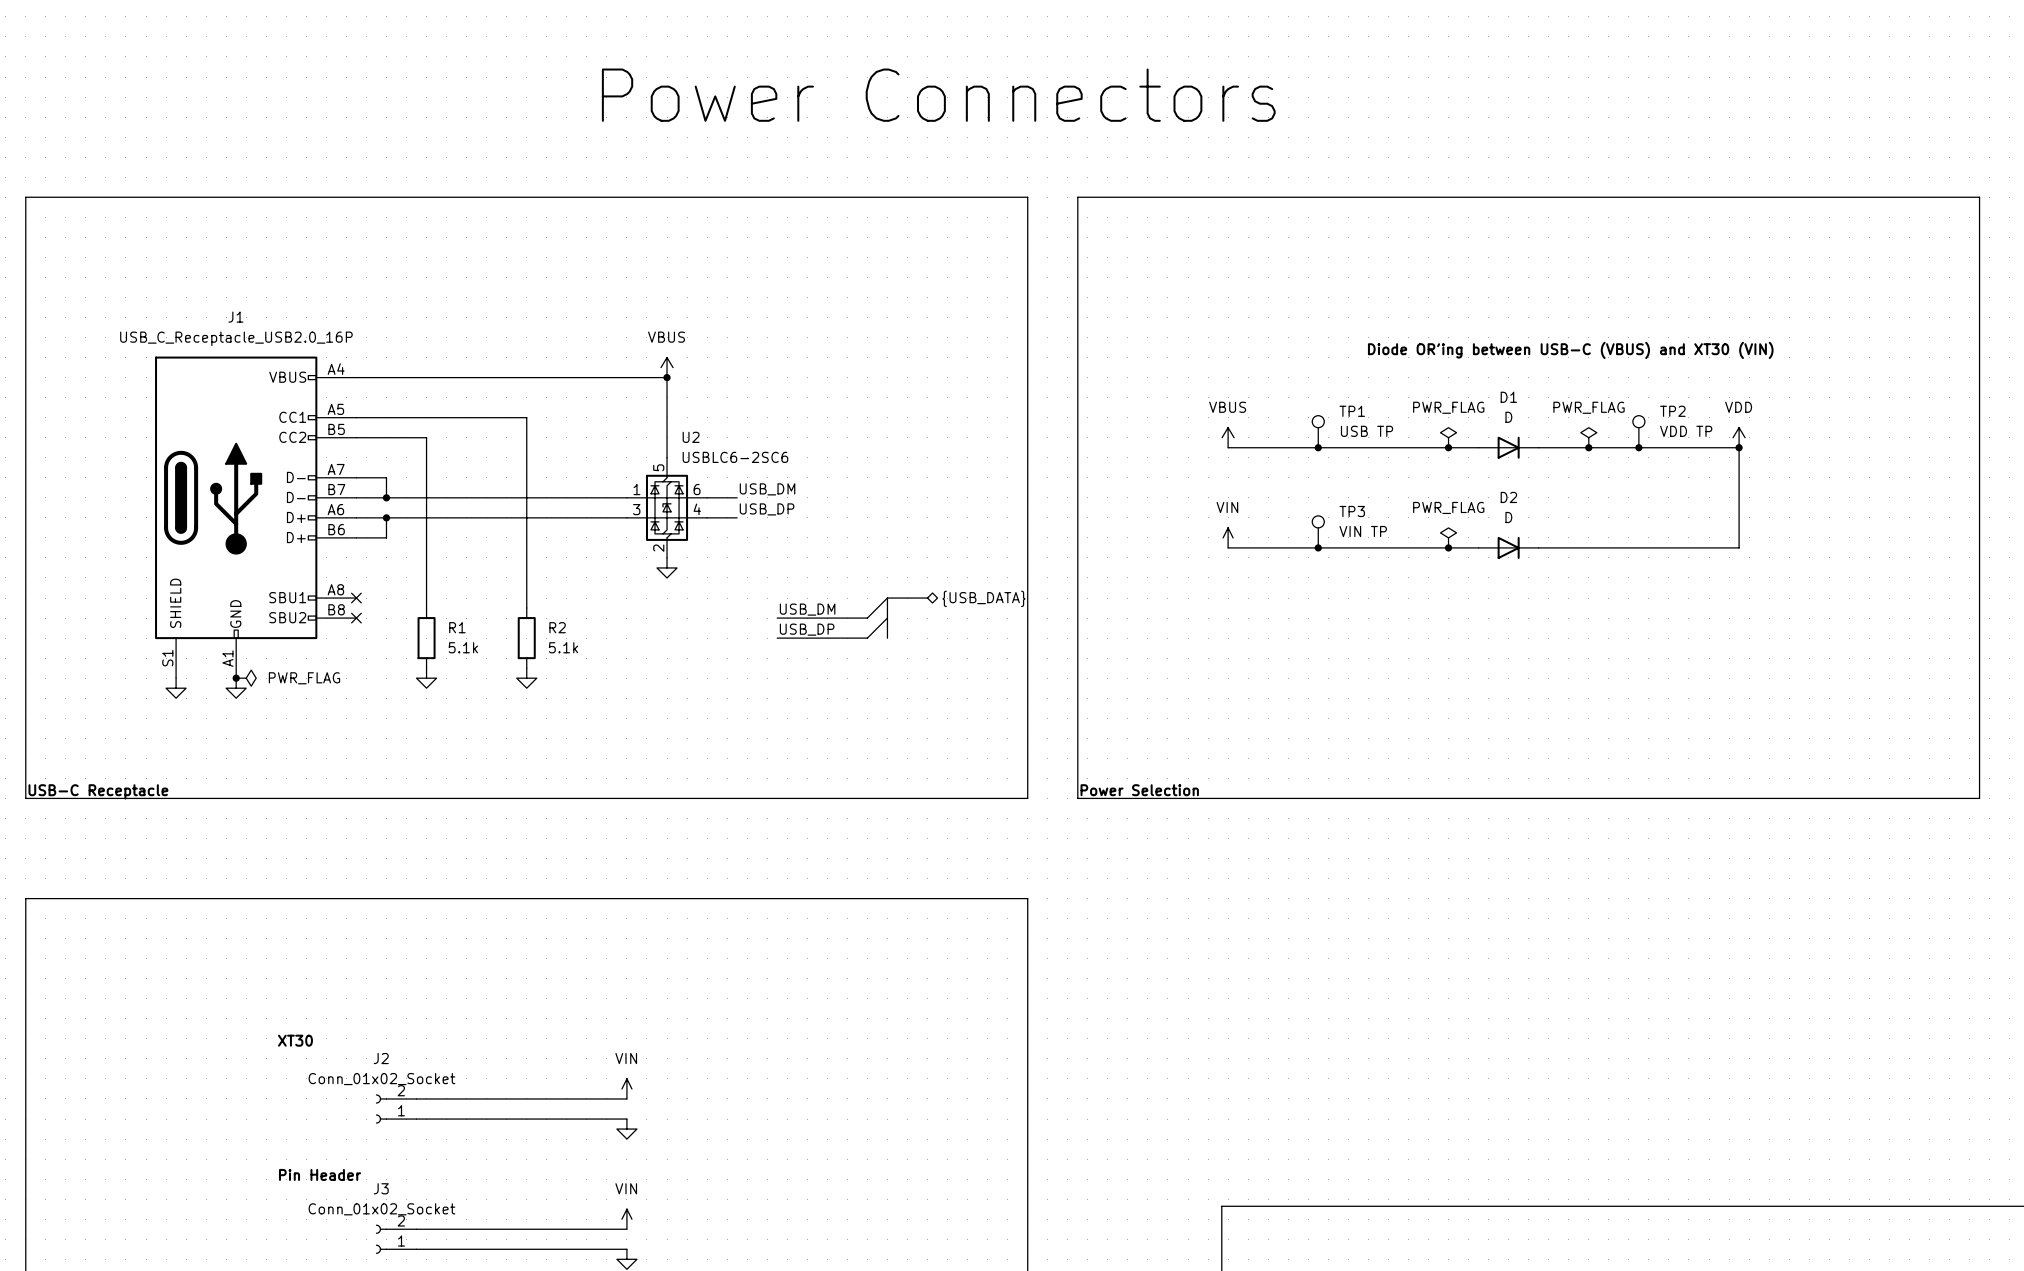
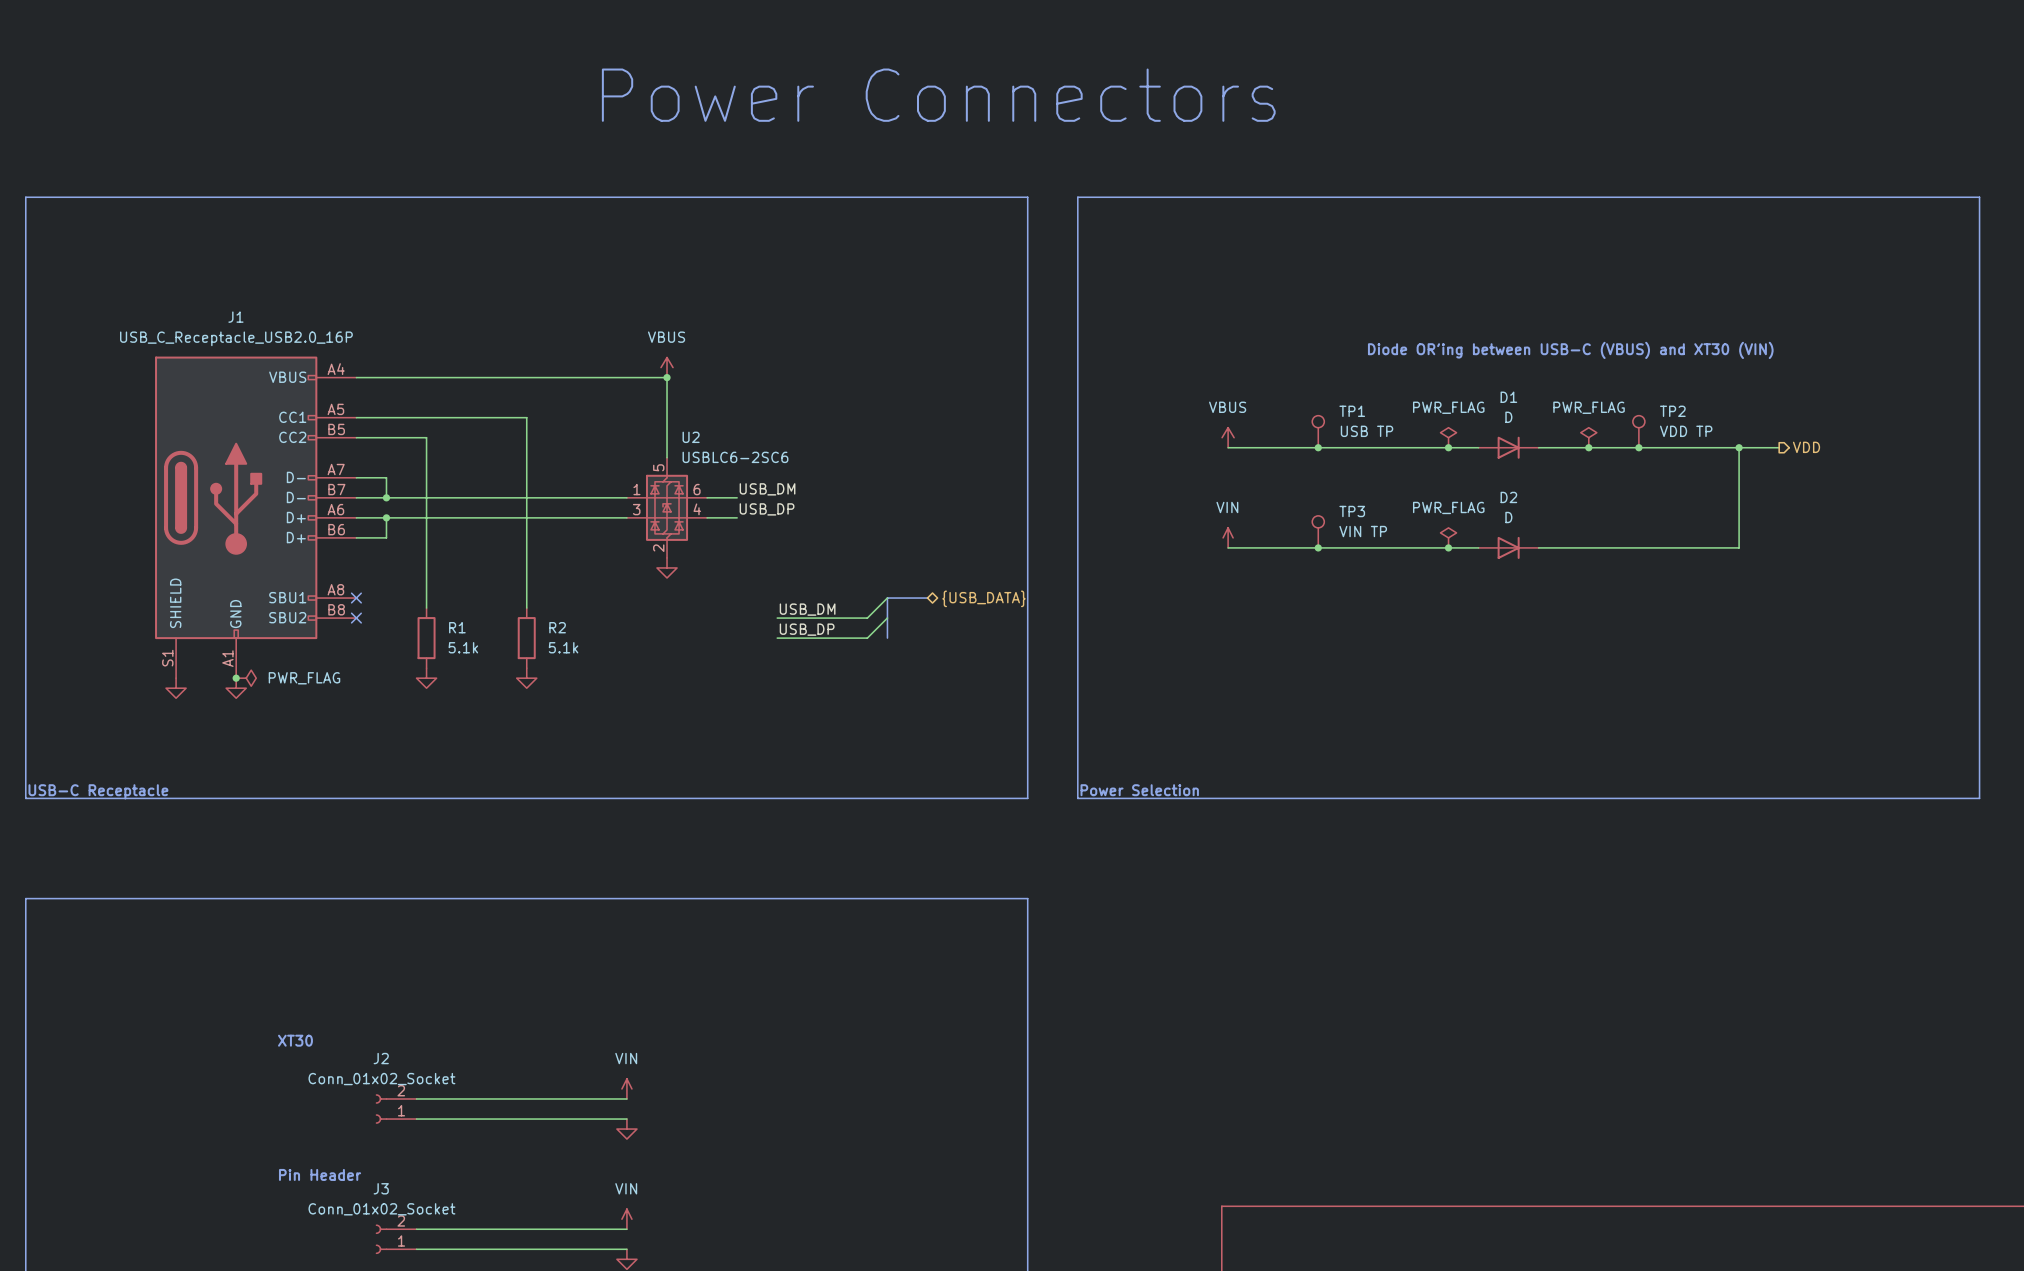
power symbol: VDD (1739, 437) -> none
wire: none -> (1739, 447) (1779, 447)
hierarchical label: none -> VDD (1806, 447)

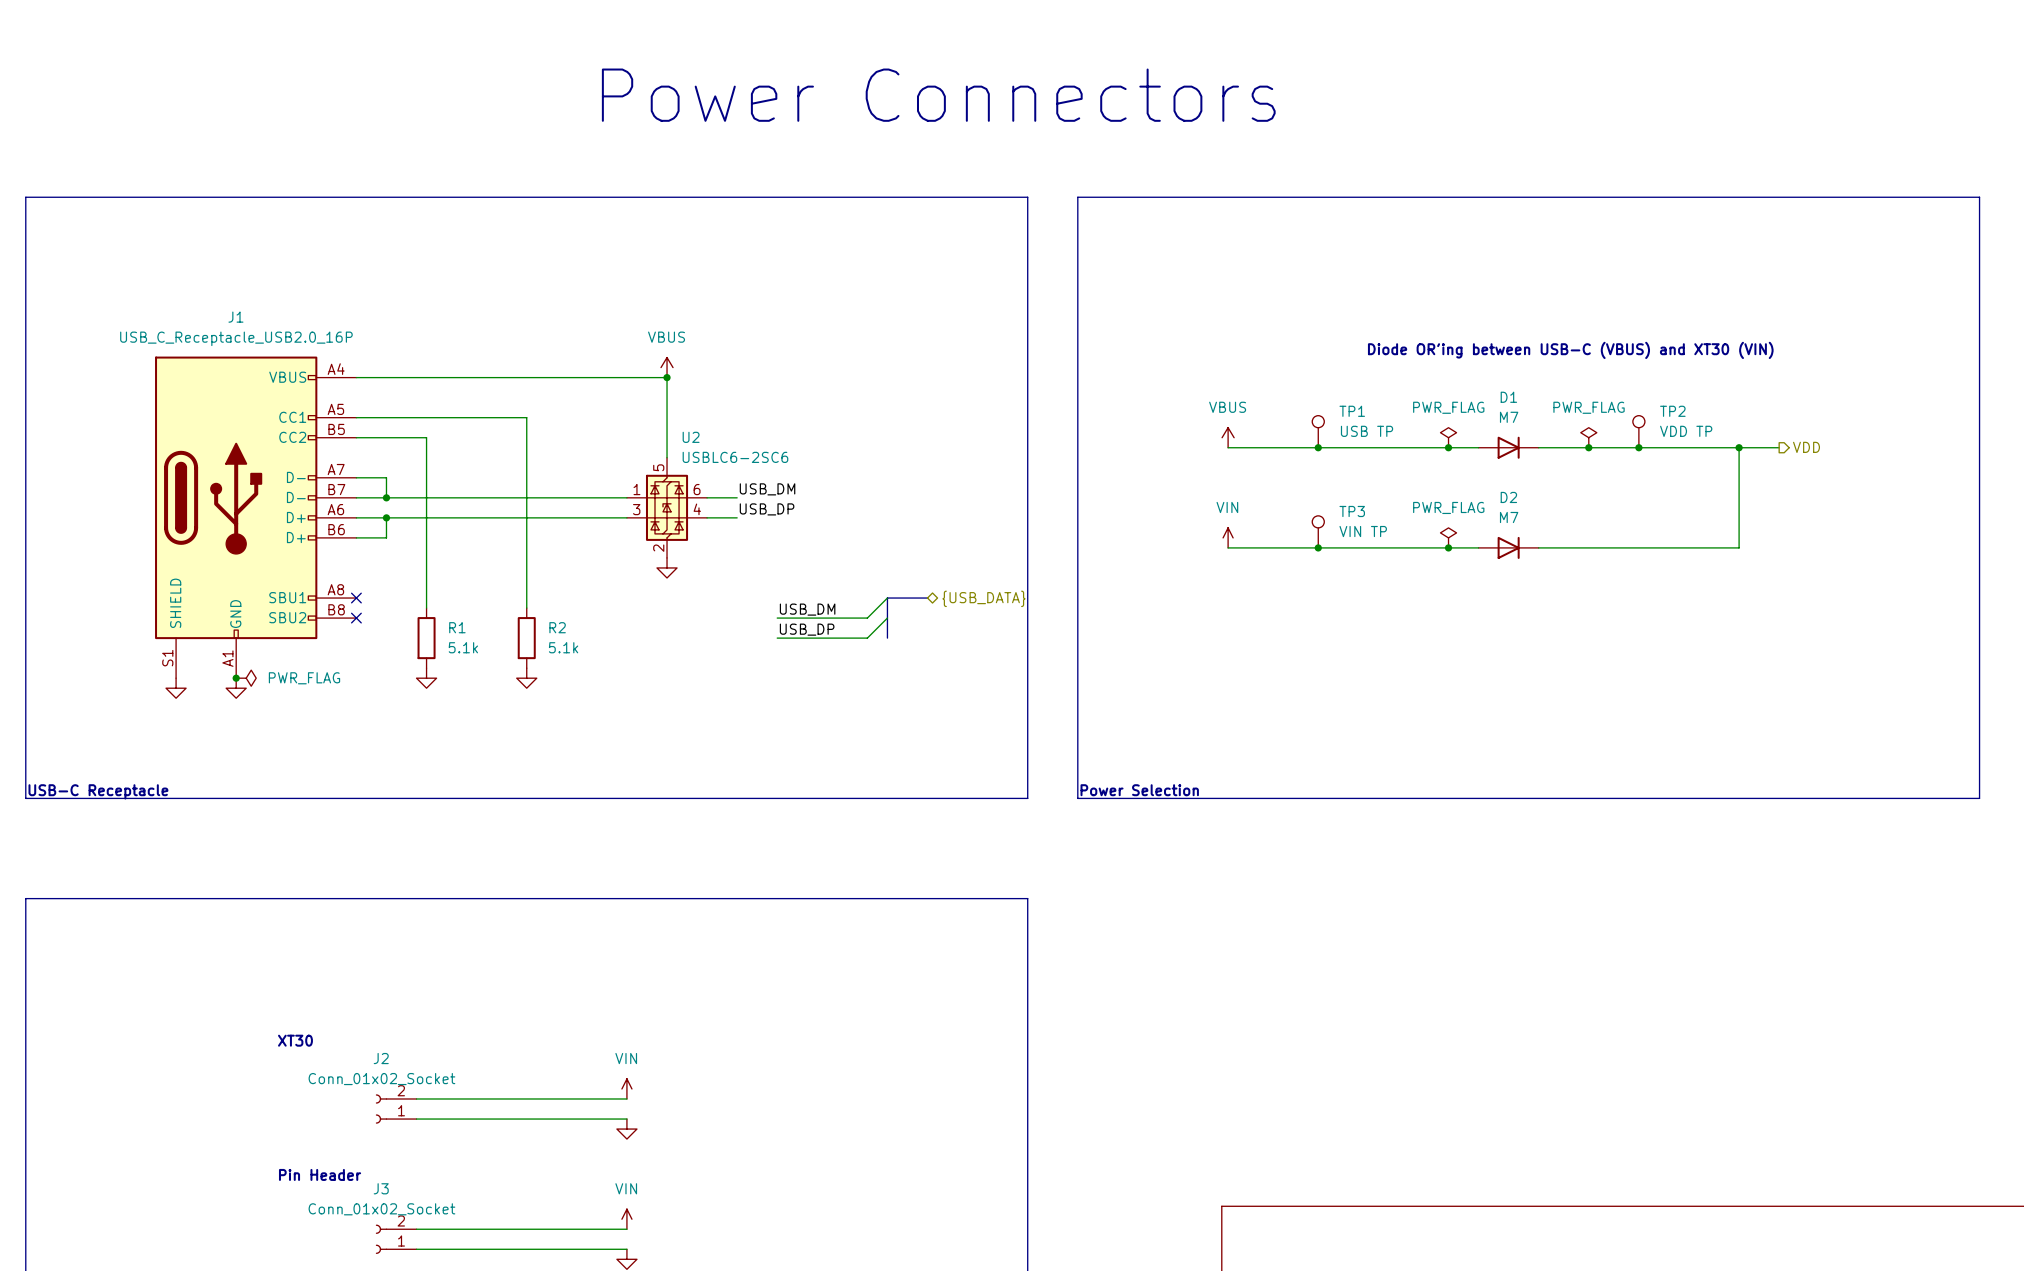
D1 value: D (1508, 417) -> M7 (1509, 417)
D2 value: D (1508, 517) -> M7 (1509, 517)

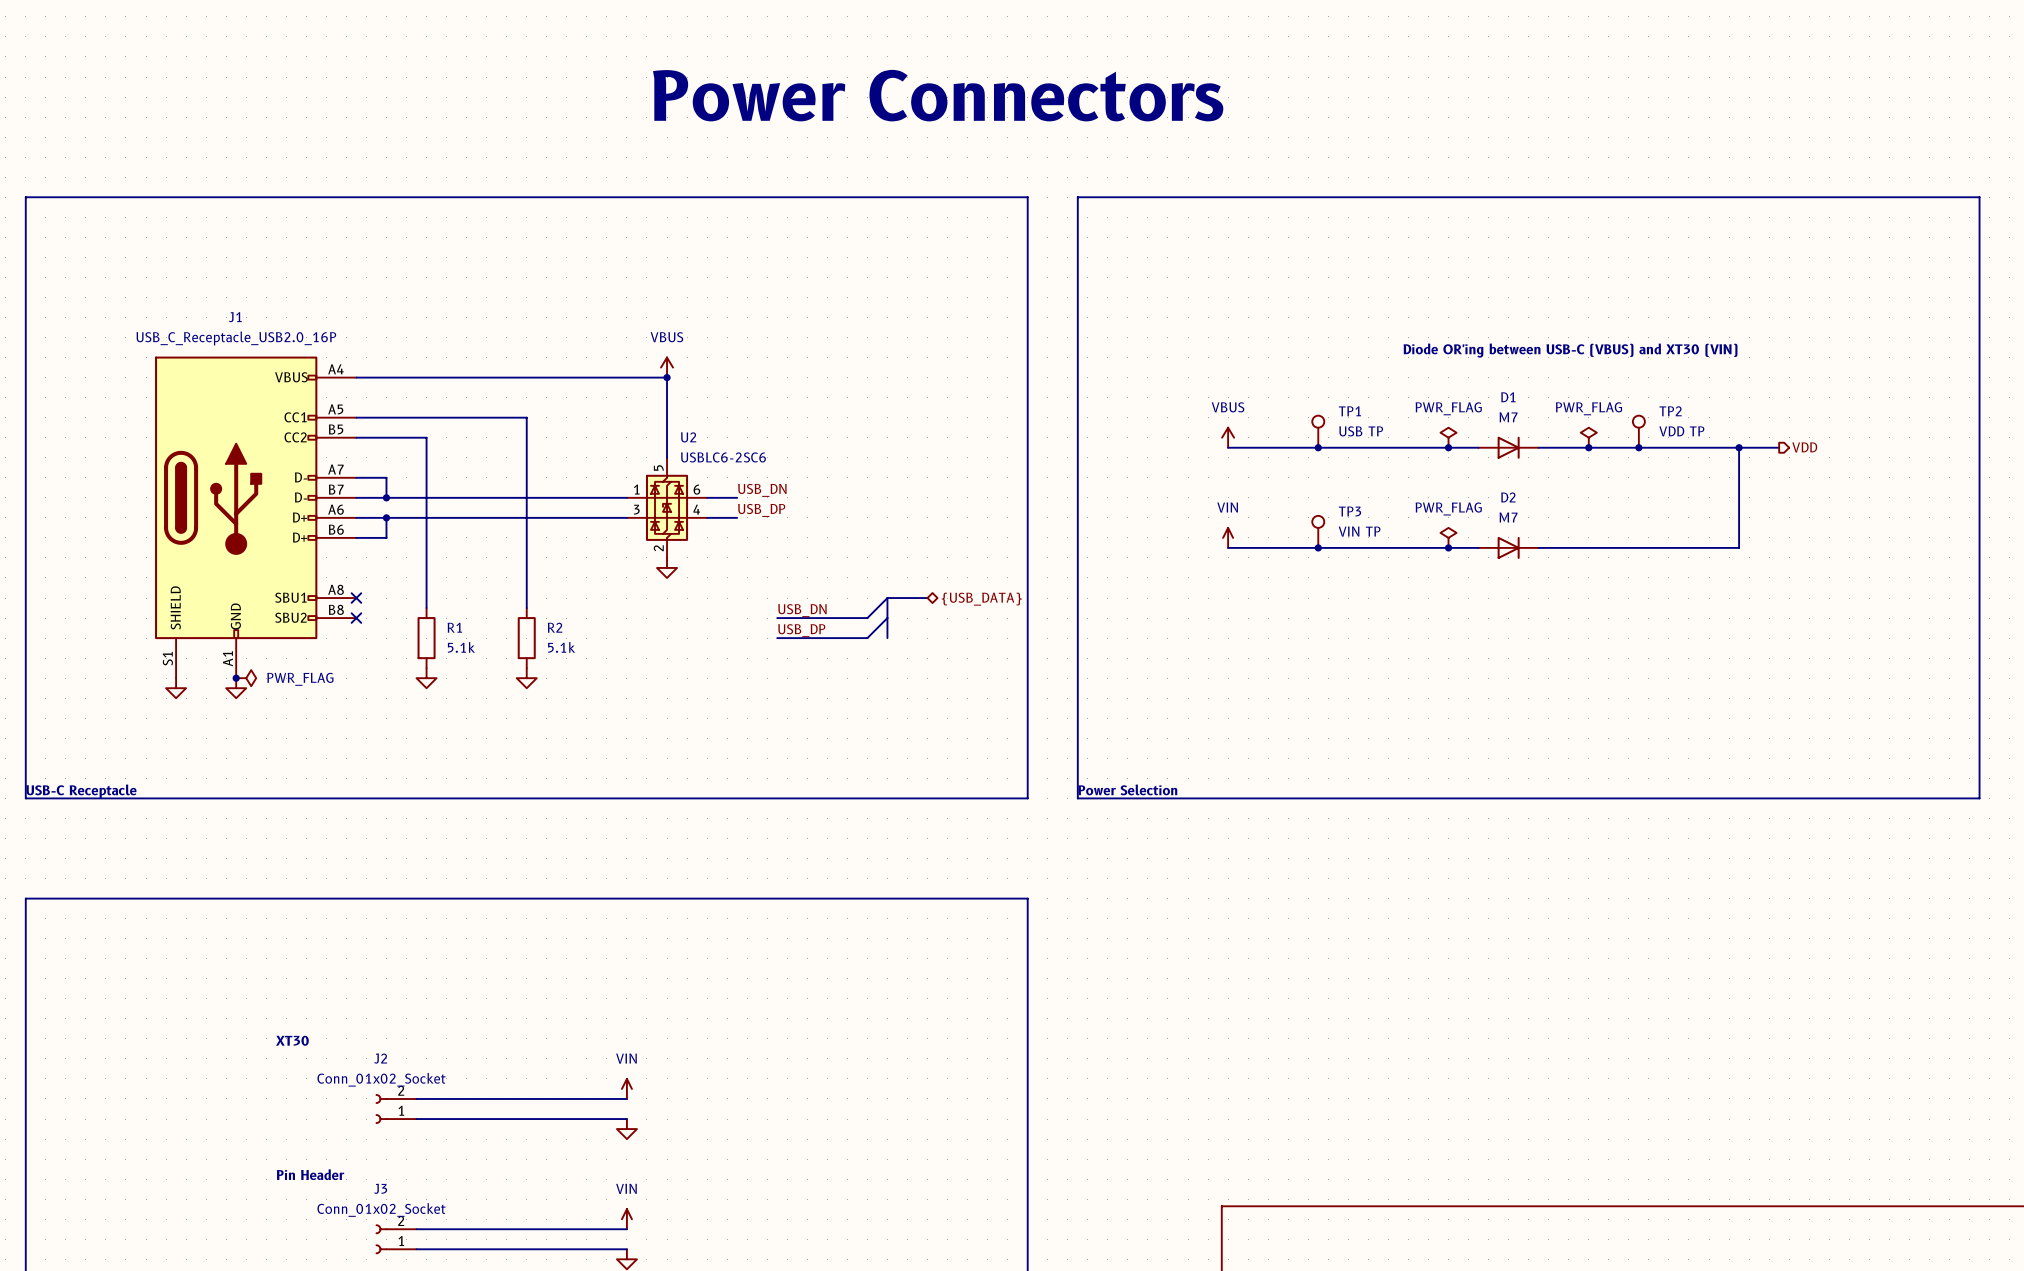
label: USB_DM (767, 489) -> USB_DN (762, 490)
label: USB_DM (807, 609) -> USB_DN (802, 610)

